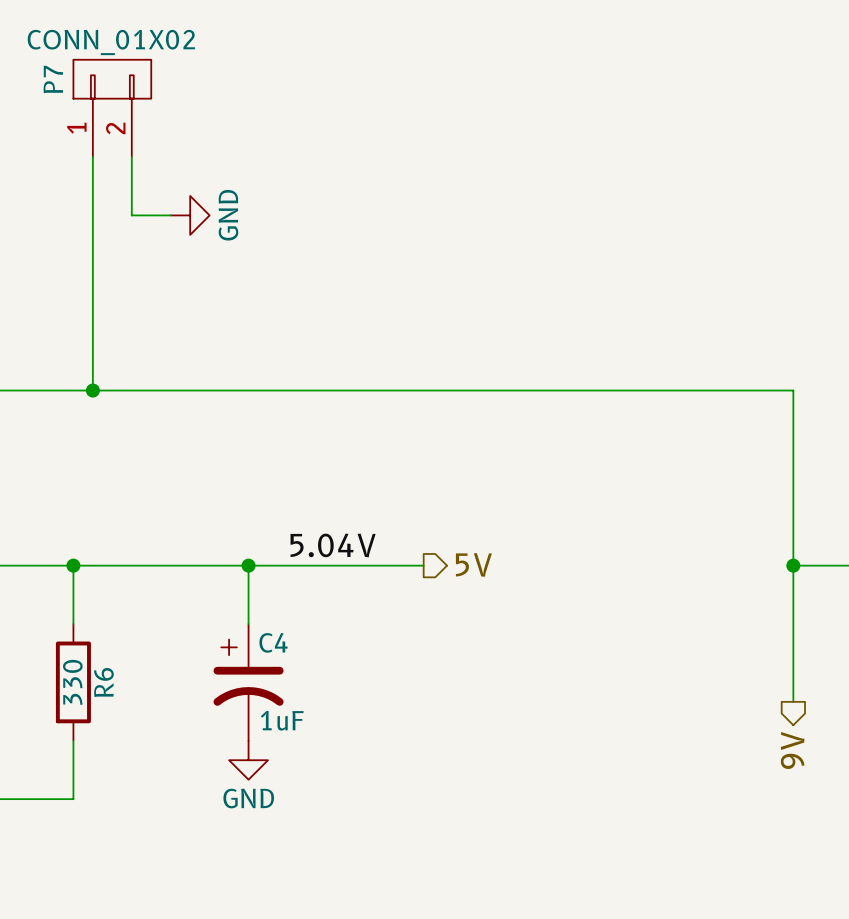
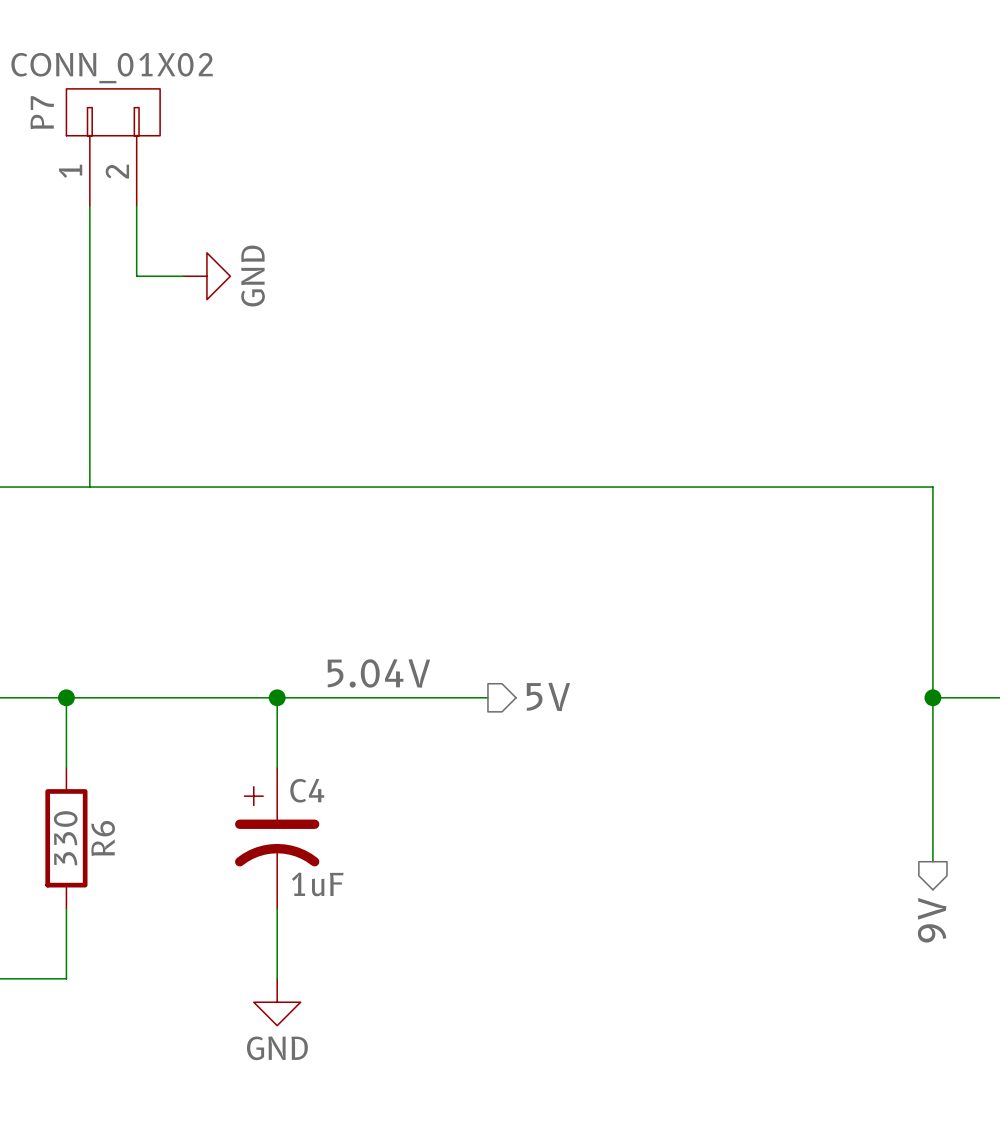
junction: (92, 390) -> none
wire: none -> (277, 908) (277, 978)
power symbol position: GND (248, 760) -> GND (277, 1002)

